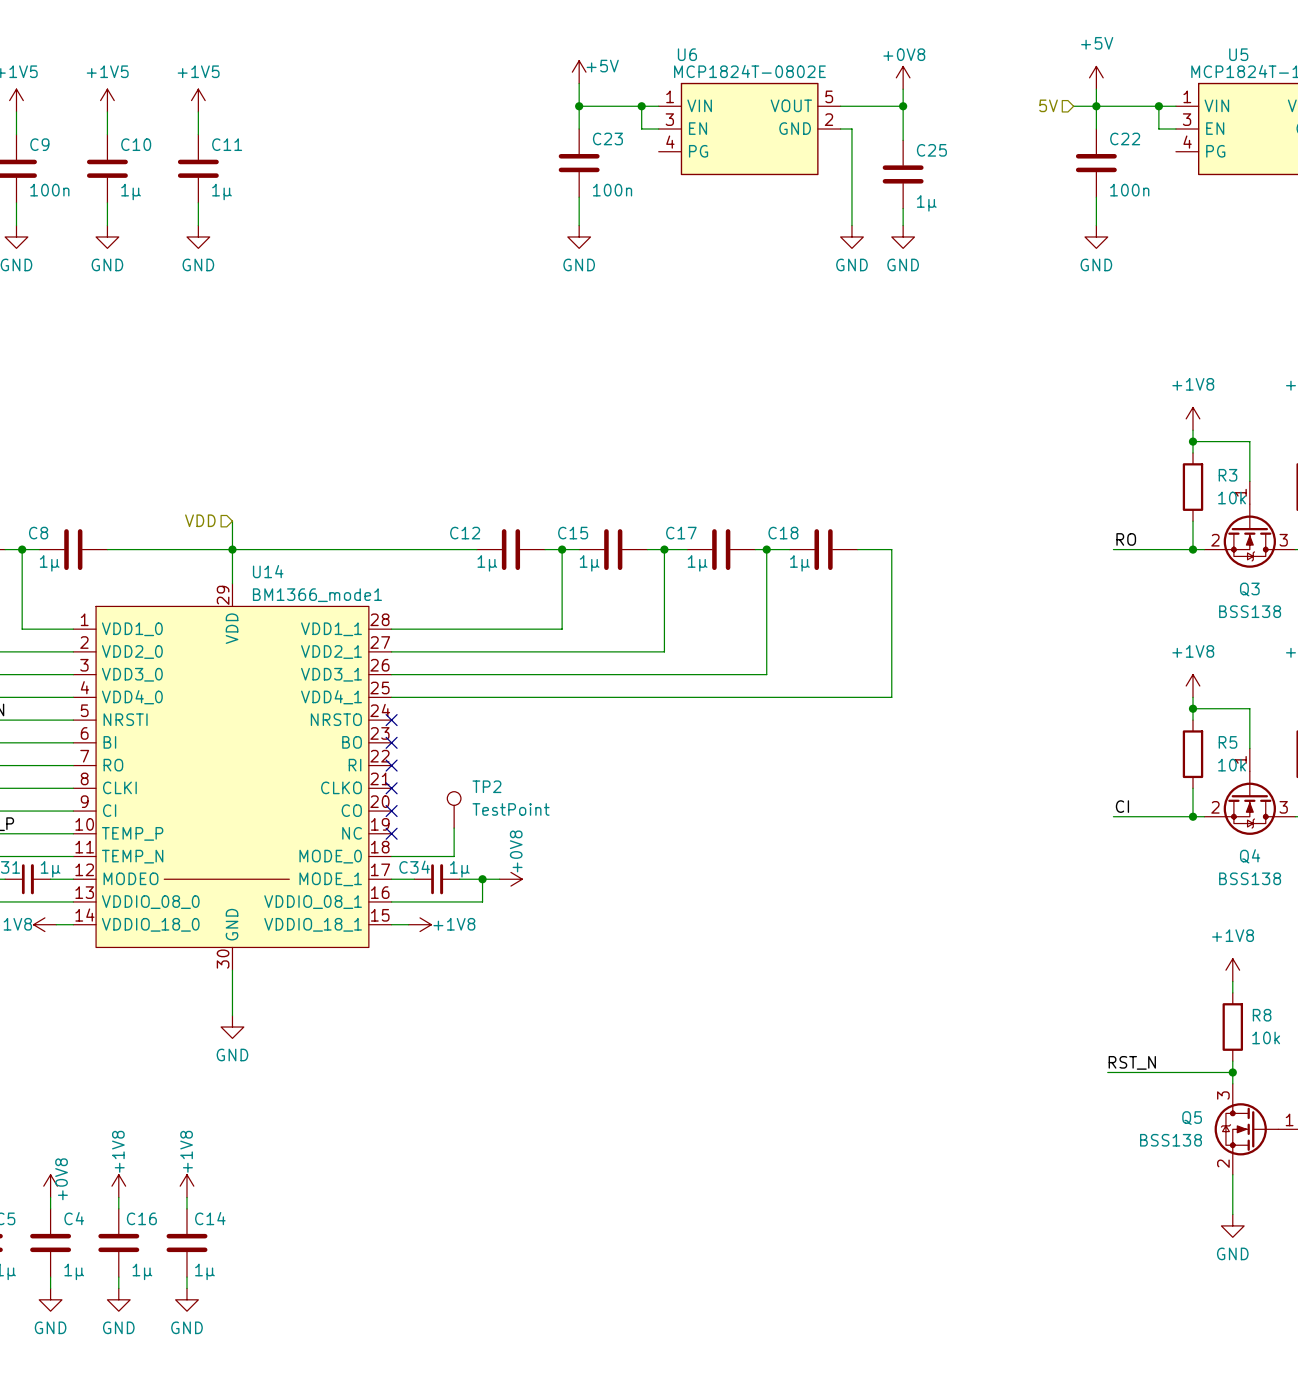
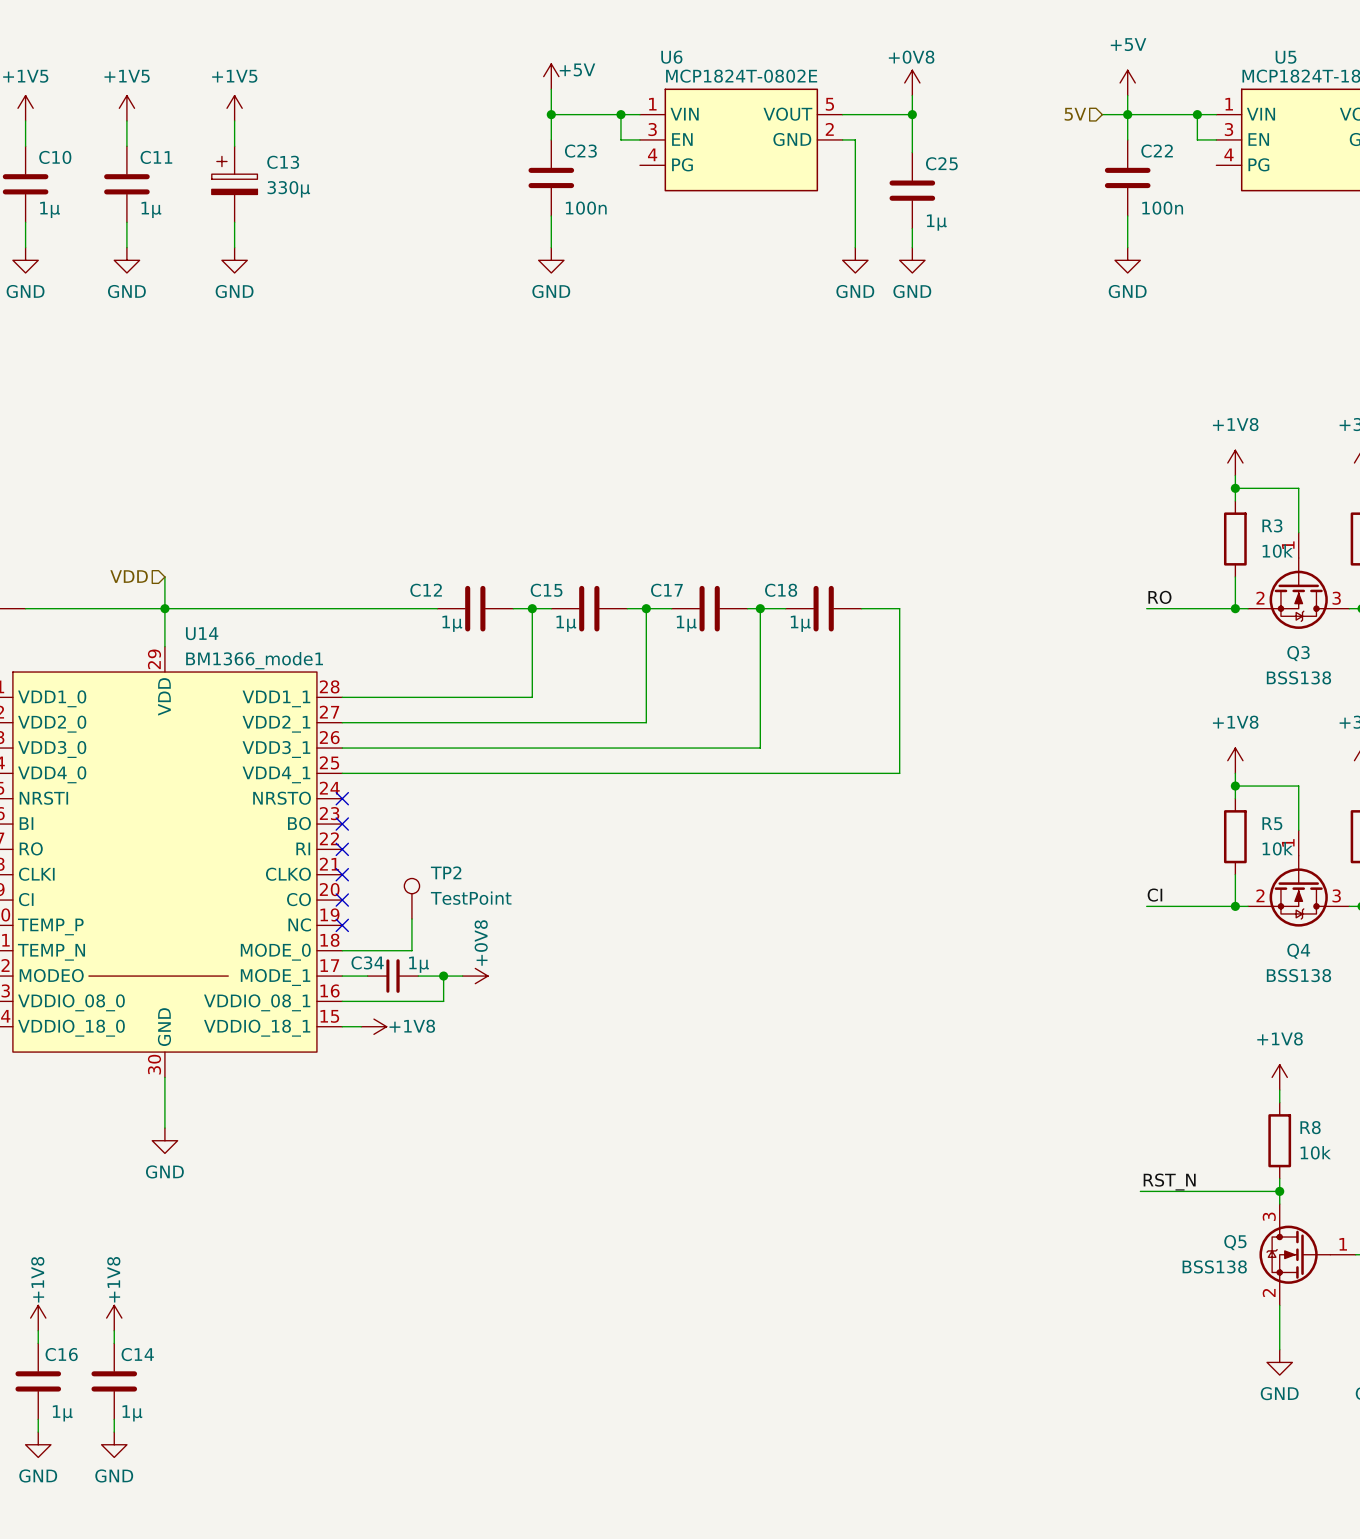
power symbol: none -> +1V5 (234, 108)
wire: none -> (234, 120) (234, 146)
C13: none -> 330µ (234, 184)
wire: none -> (234, 222) (234, 247)
power symbol: none -> GND (234, 260)

